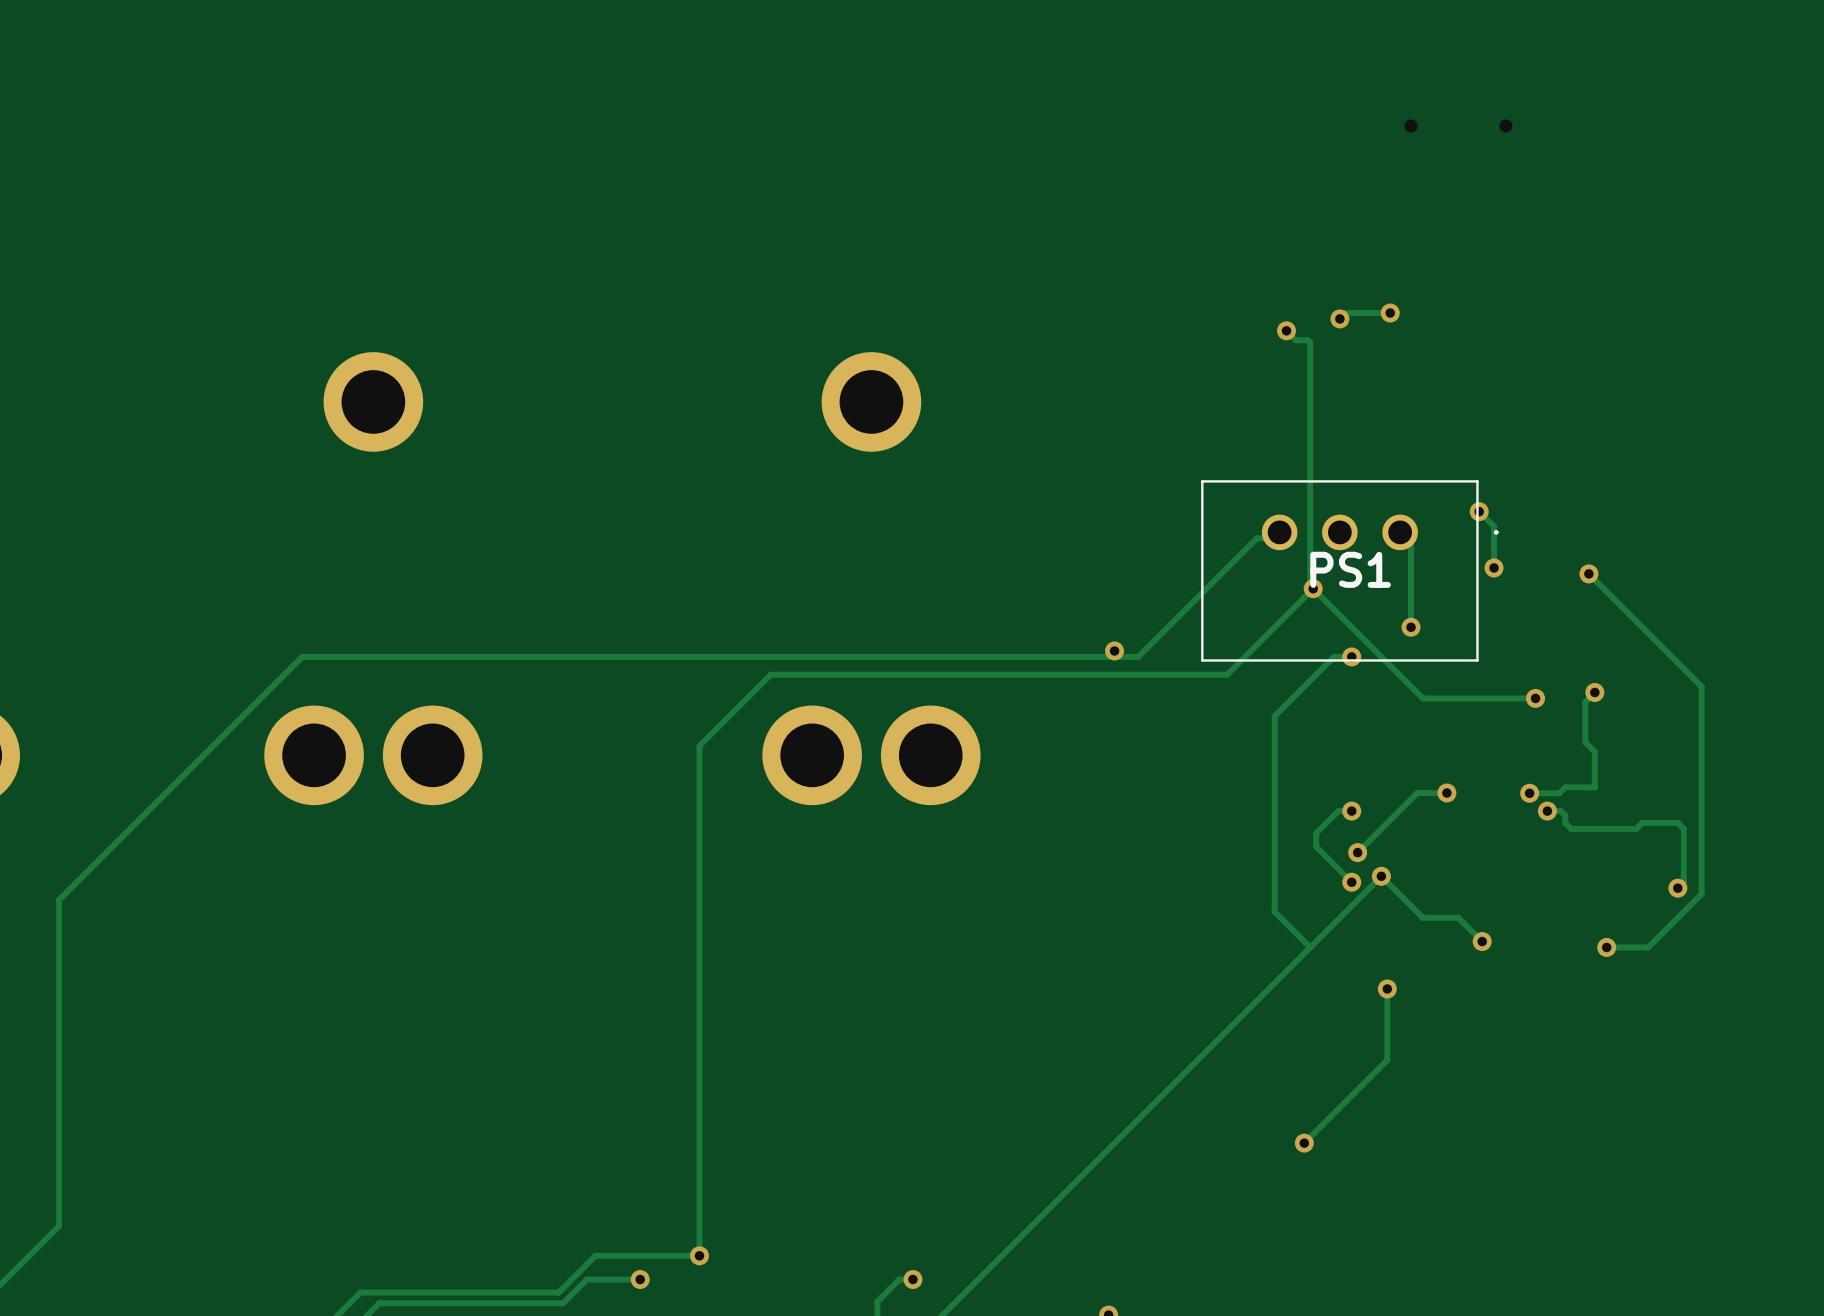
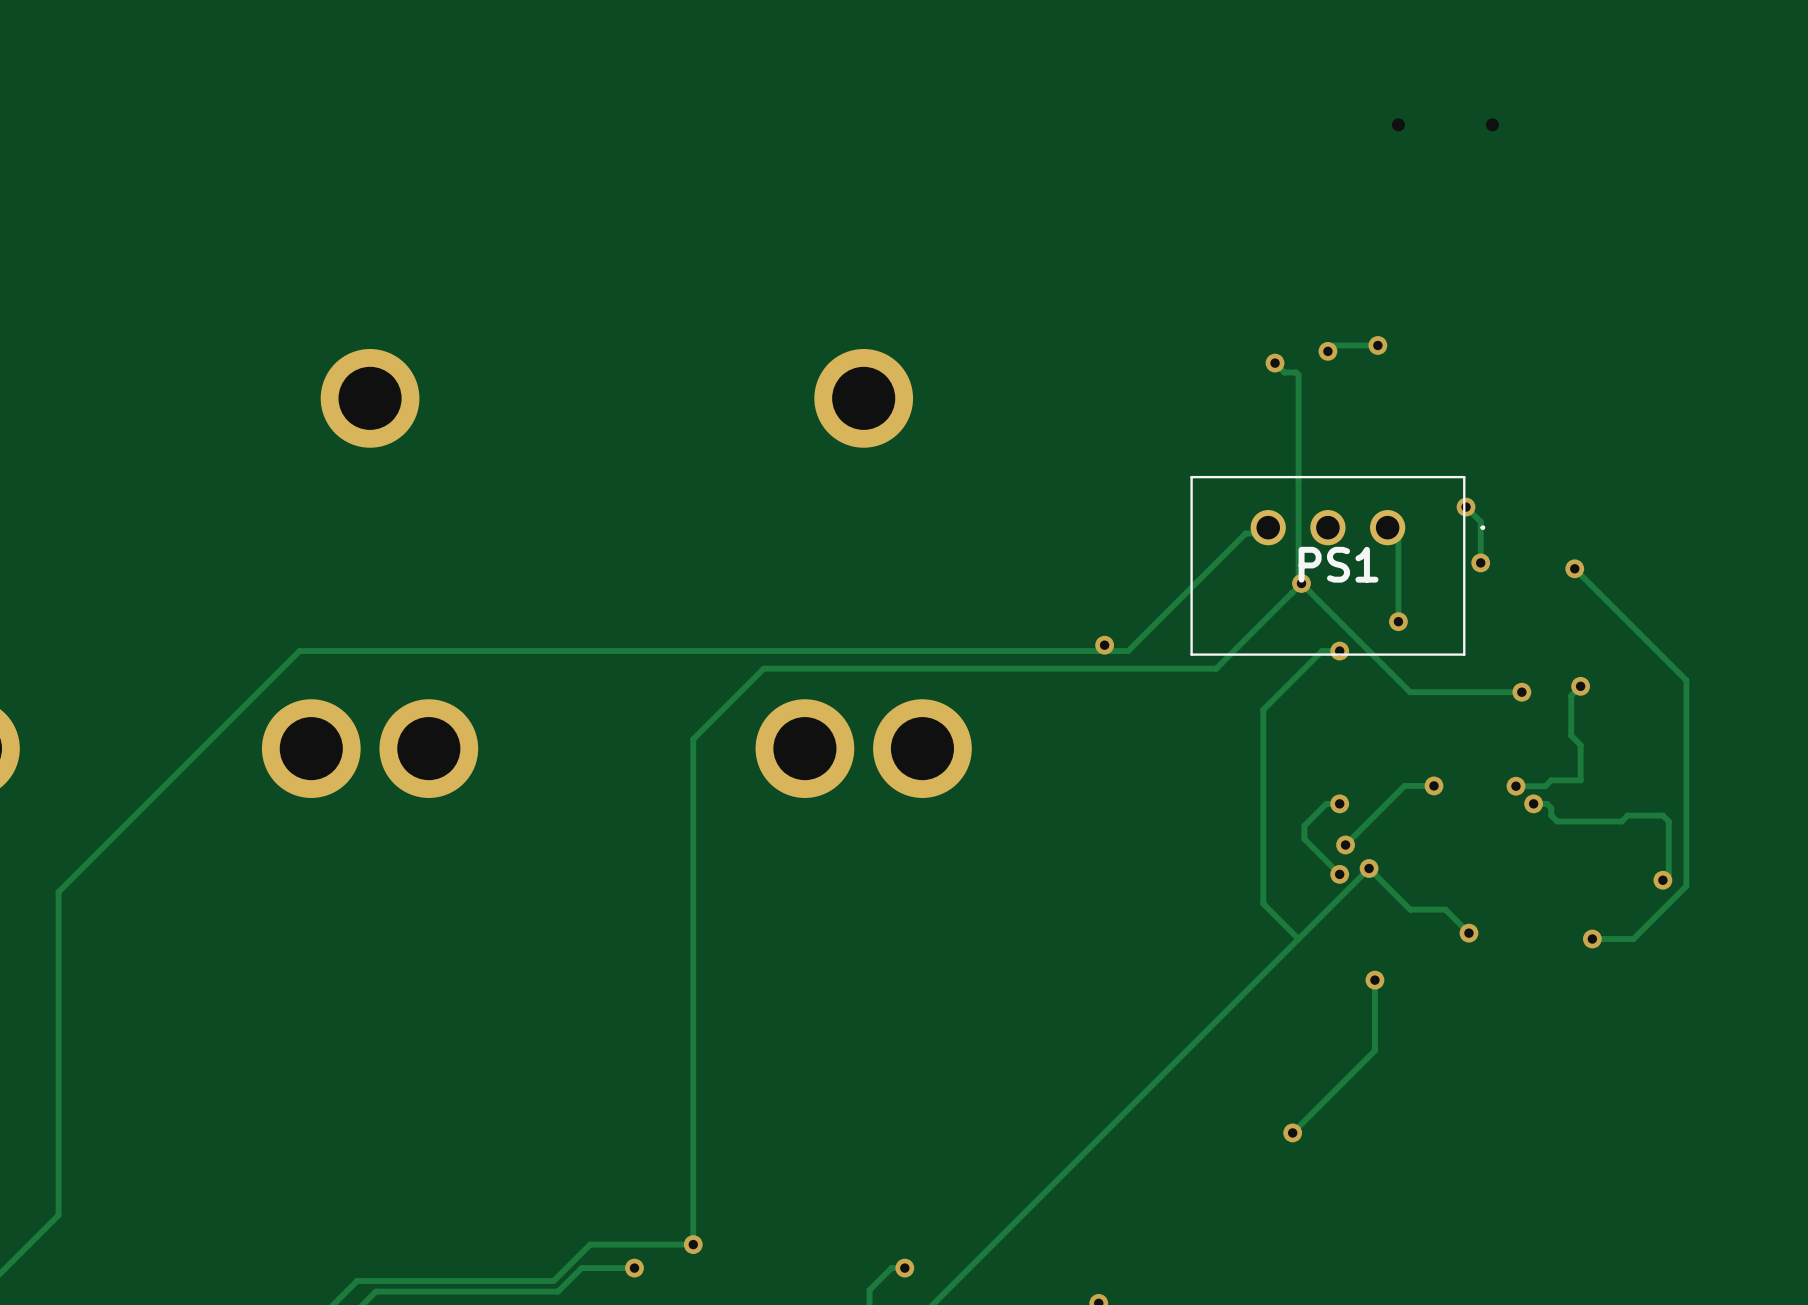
track: (1390, 313) (1345, 313) (1339, 318) -> (1377, 345) (1333, 345) (1327, 351)
via: (1390, 313) -> none
via: (1339, 318) -> none
track: (1286, 330) (1296, 340) (1307, 340) (1310, 342) (1310, 378) -> (1275, 363) (1284, 372) (1296, 372) (1298, 374)
via: (1286, 330) -> none
via: none -> (1377, 345)
via: none -> (1327, 351)
via: none -> (1275, 363)

